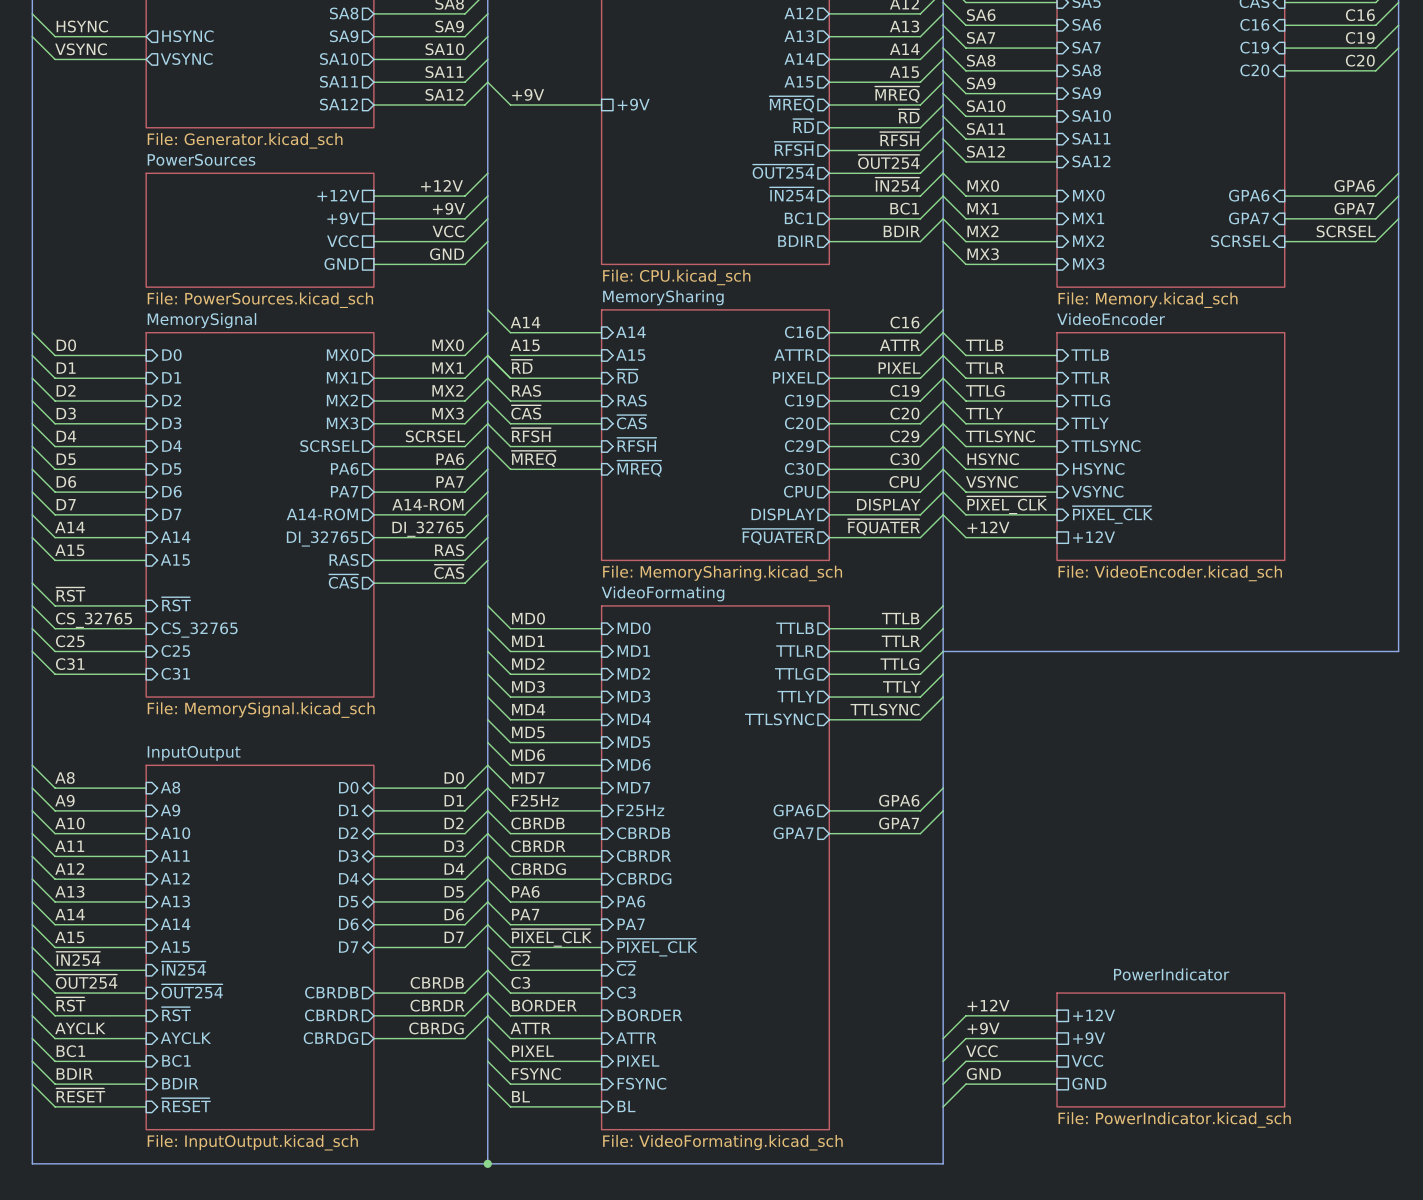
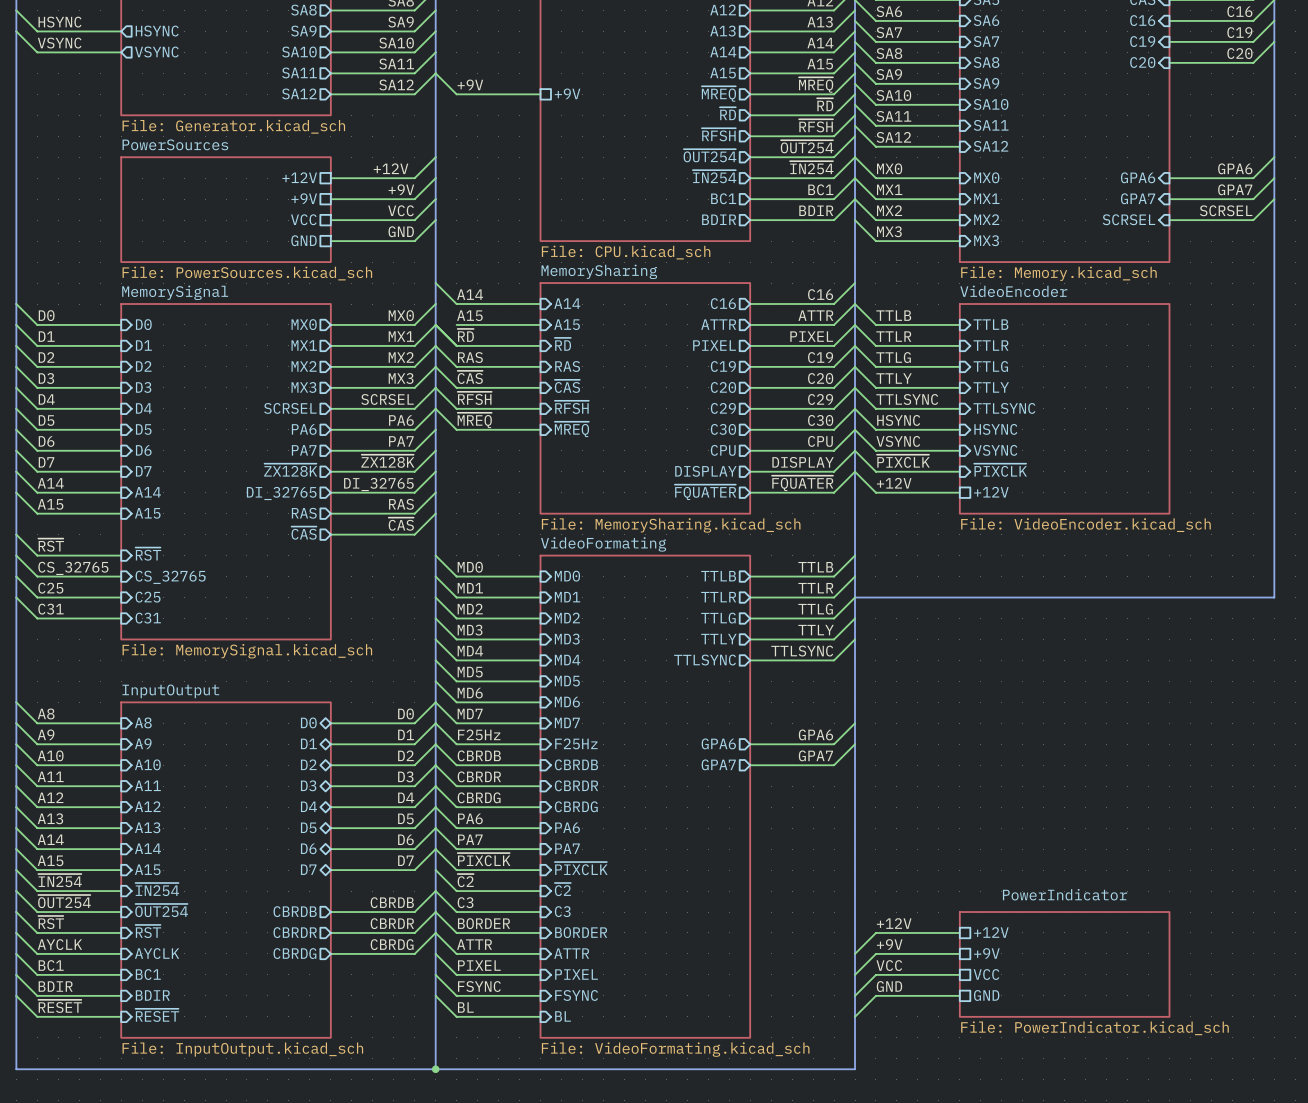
label: A14-ROM (427, 504) -> ~{ZX128K} (387, 461)
label: ~{PIXEL_CLK} (1007, 505) -> ~{PIXCLK} (903, 461)
sheet pin: A14-ROM (322, 514) -> ~{ZX128K} (290, 470)
sheet pin: ~{PIXEL_CLK} (1112, 514) -> ~{PIXCLK} (1000, 470)
label: ~{PIXEL_CLK} (551, 937) -> ~{PIXCLK} (484, 859)
sheet pin: ~{PIXEL_CLK} (657, 947) -> ~{PIXCLK} (581, 868)

